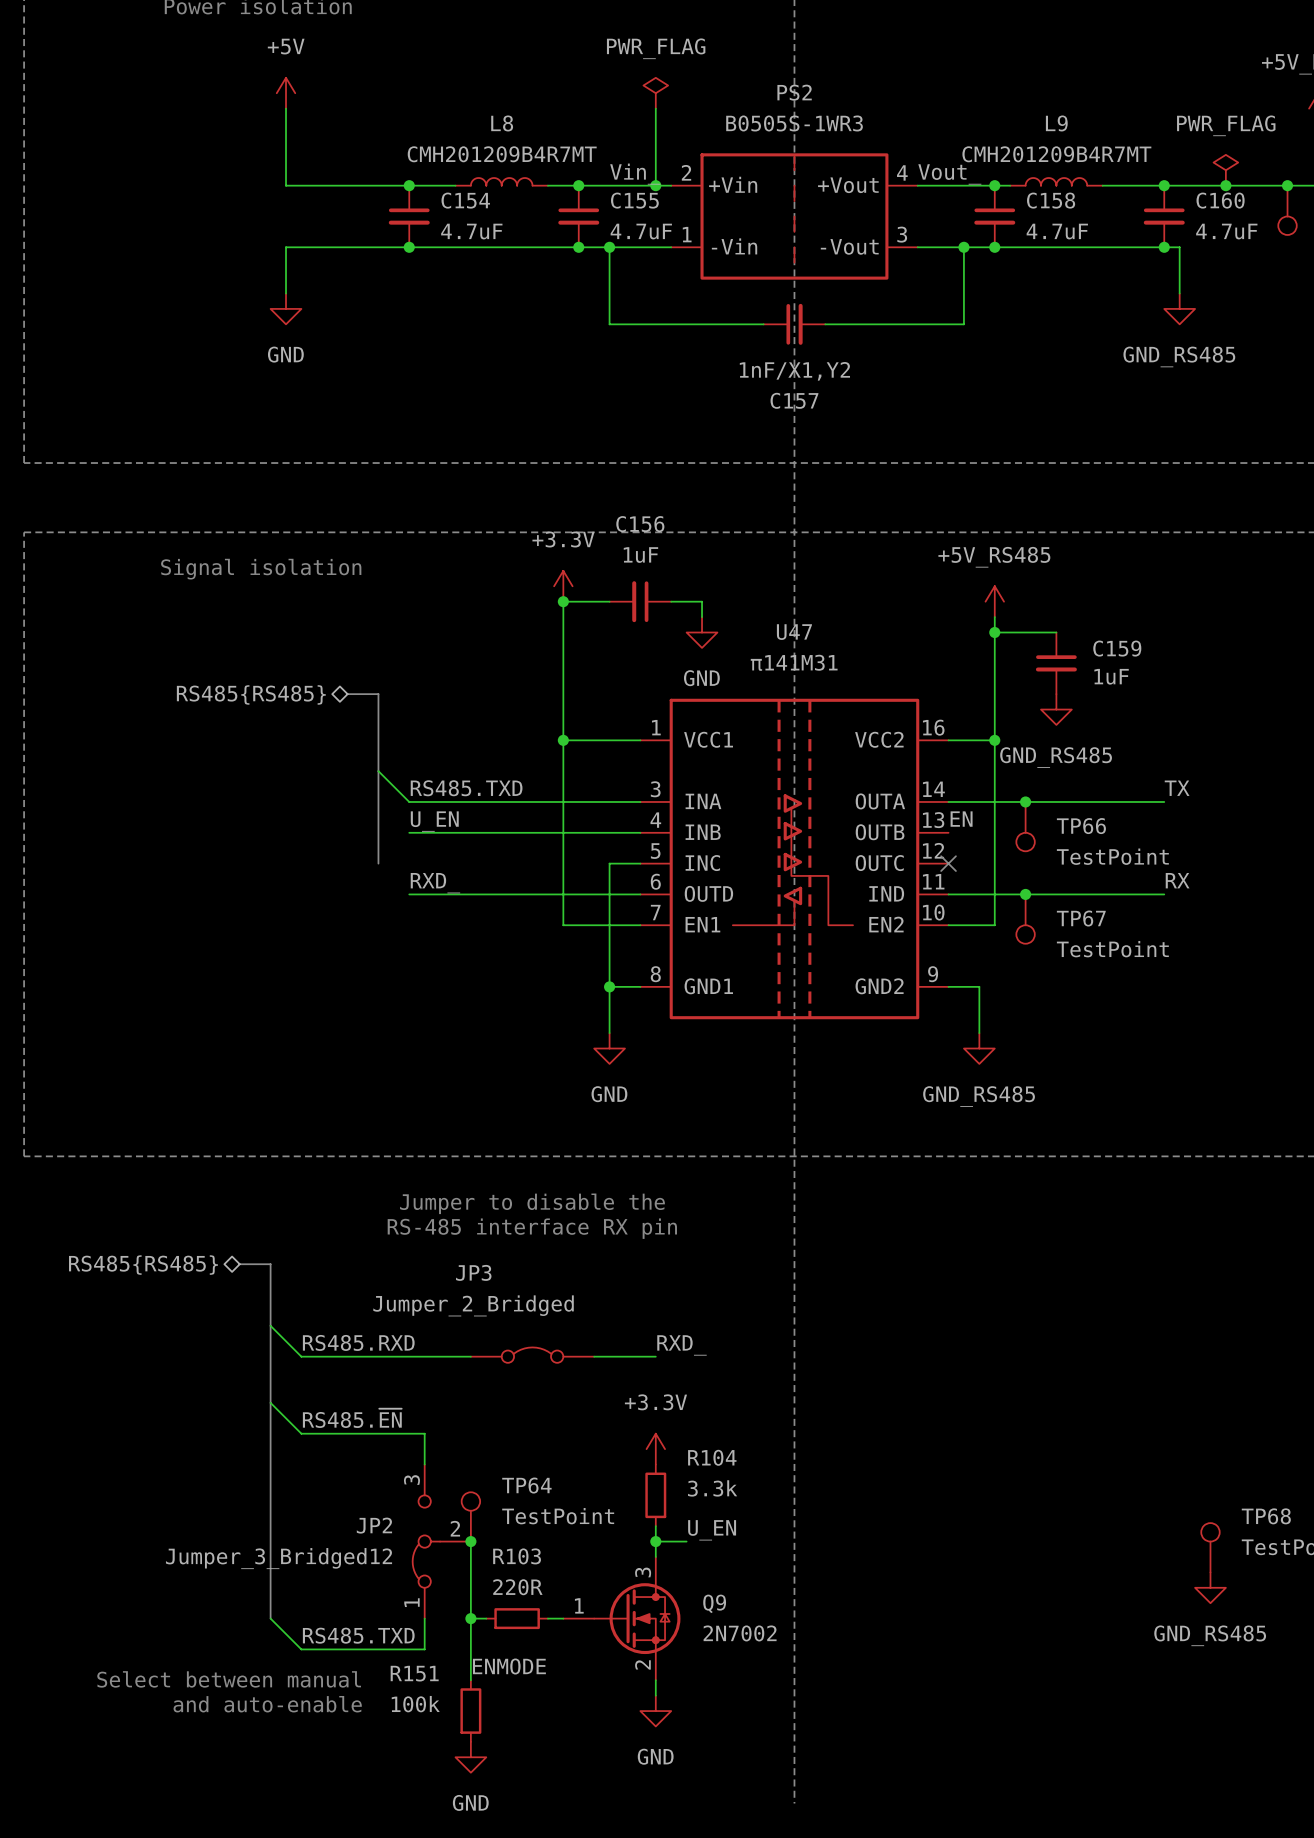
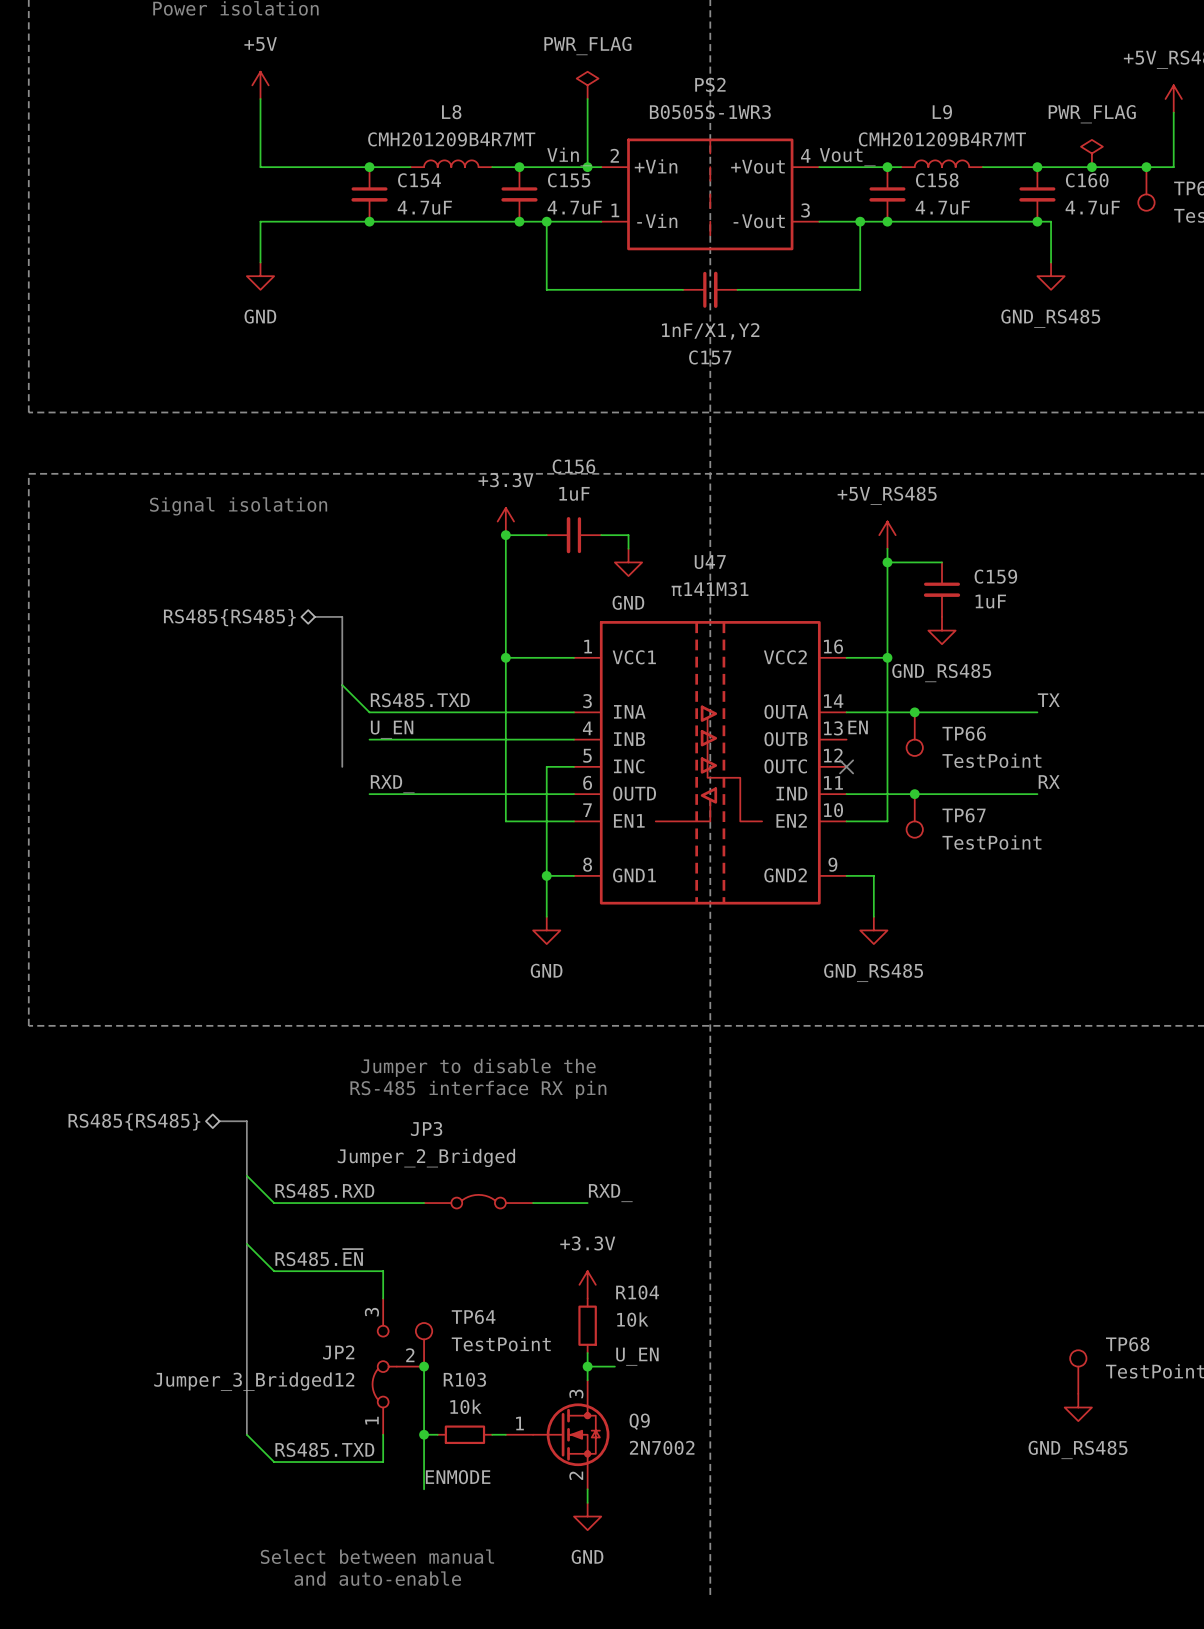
R104 value: 3.3k (712, 1488) -> 10k (632, 1319)
R103 value: 220R (517, 1587) -> 10k (465, 1406)
text position: Select between manual (229, 1679) -> Select between manual (377, 1556)
text position: and auto-enable (267, 1704) -> and auto-enable (377, 1578)
R151: 100k (470, 1711) -> none
power symbol: GND (470, 1757) -> none

